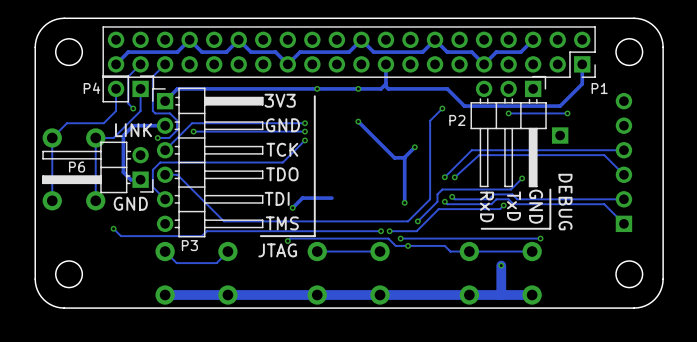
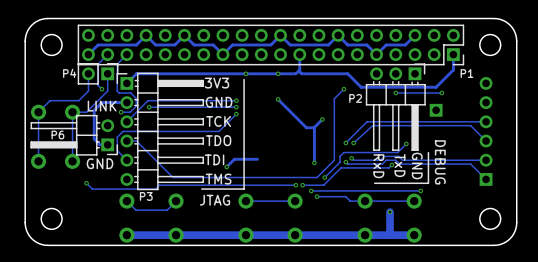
track: (287, 241) (290, 238) (388, 238) (395, 245) (408, 245) -> none
via: (287, 241) -> none

